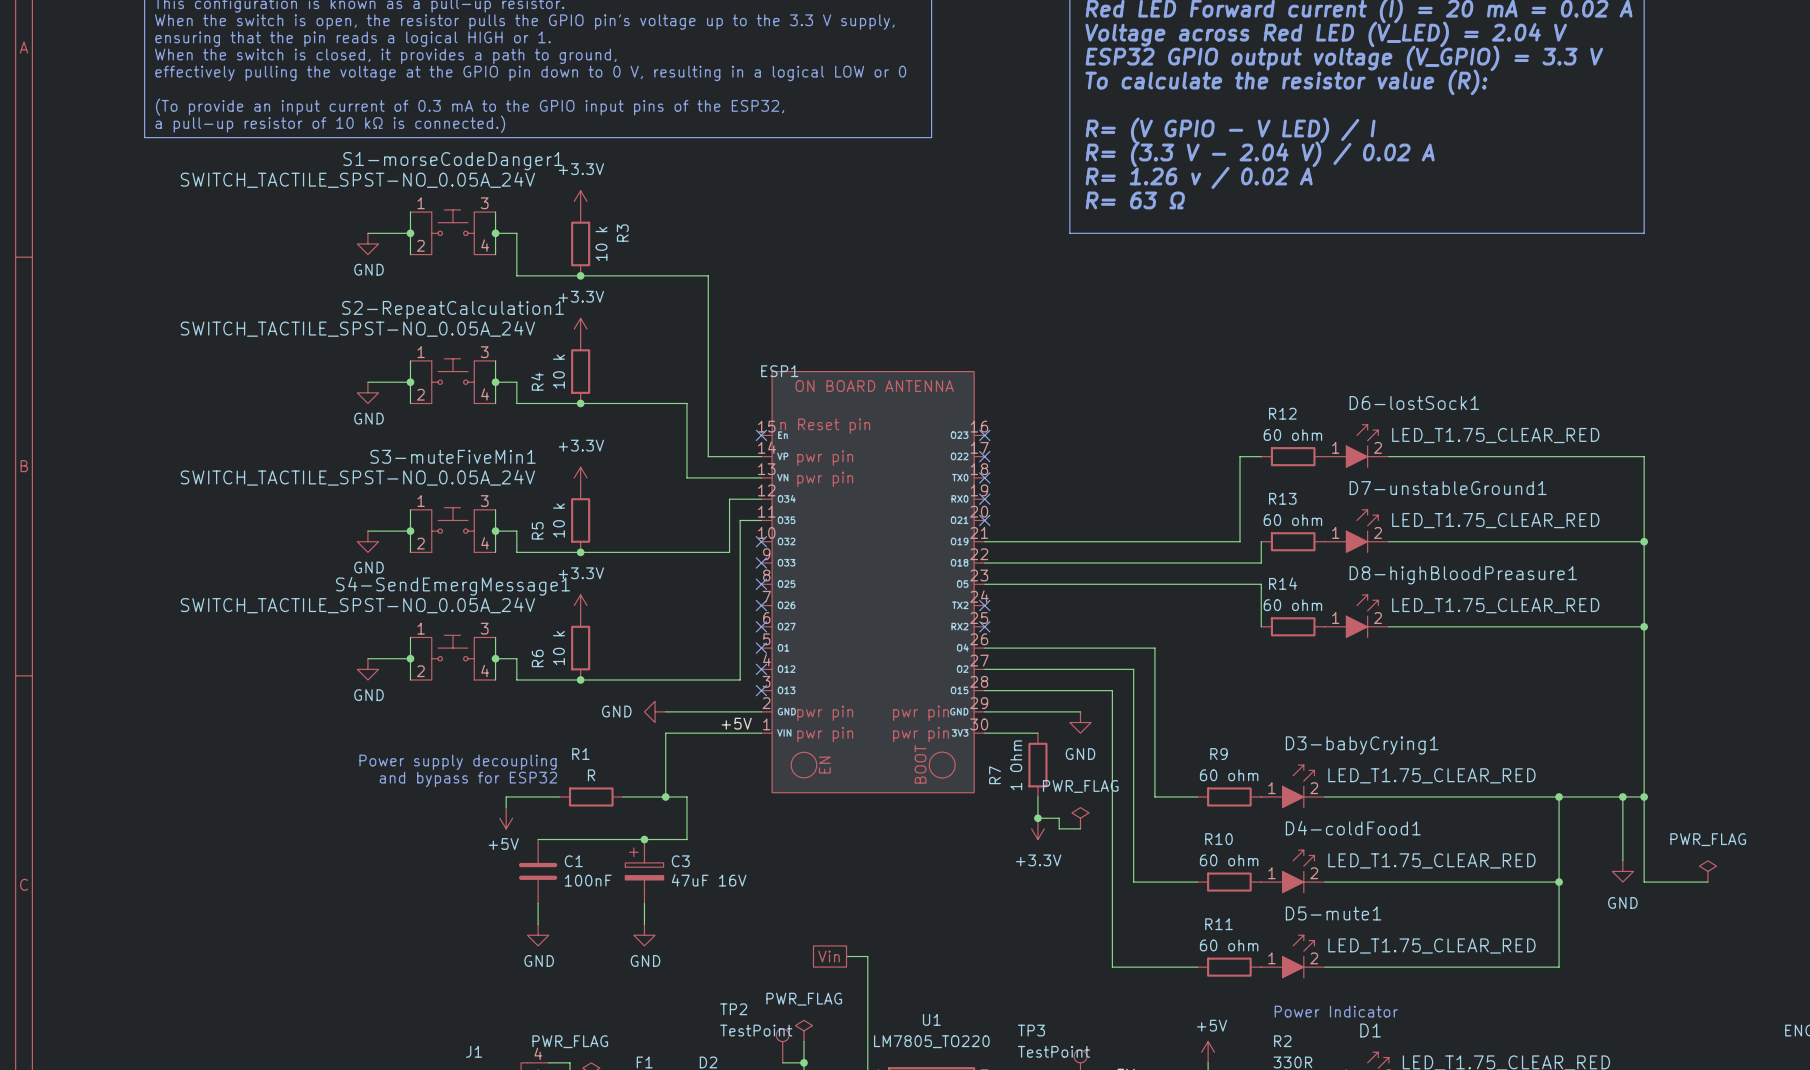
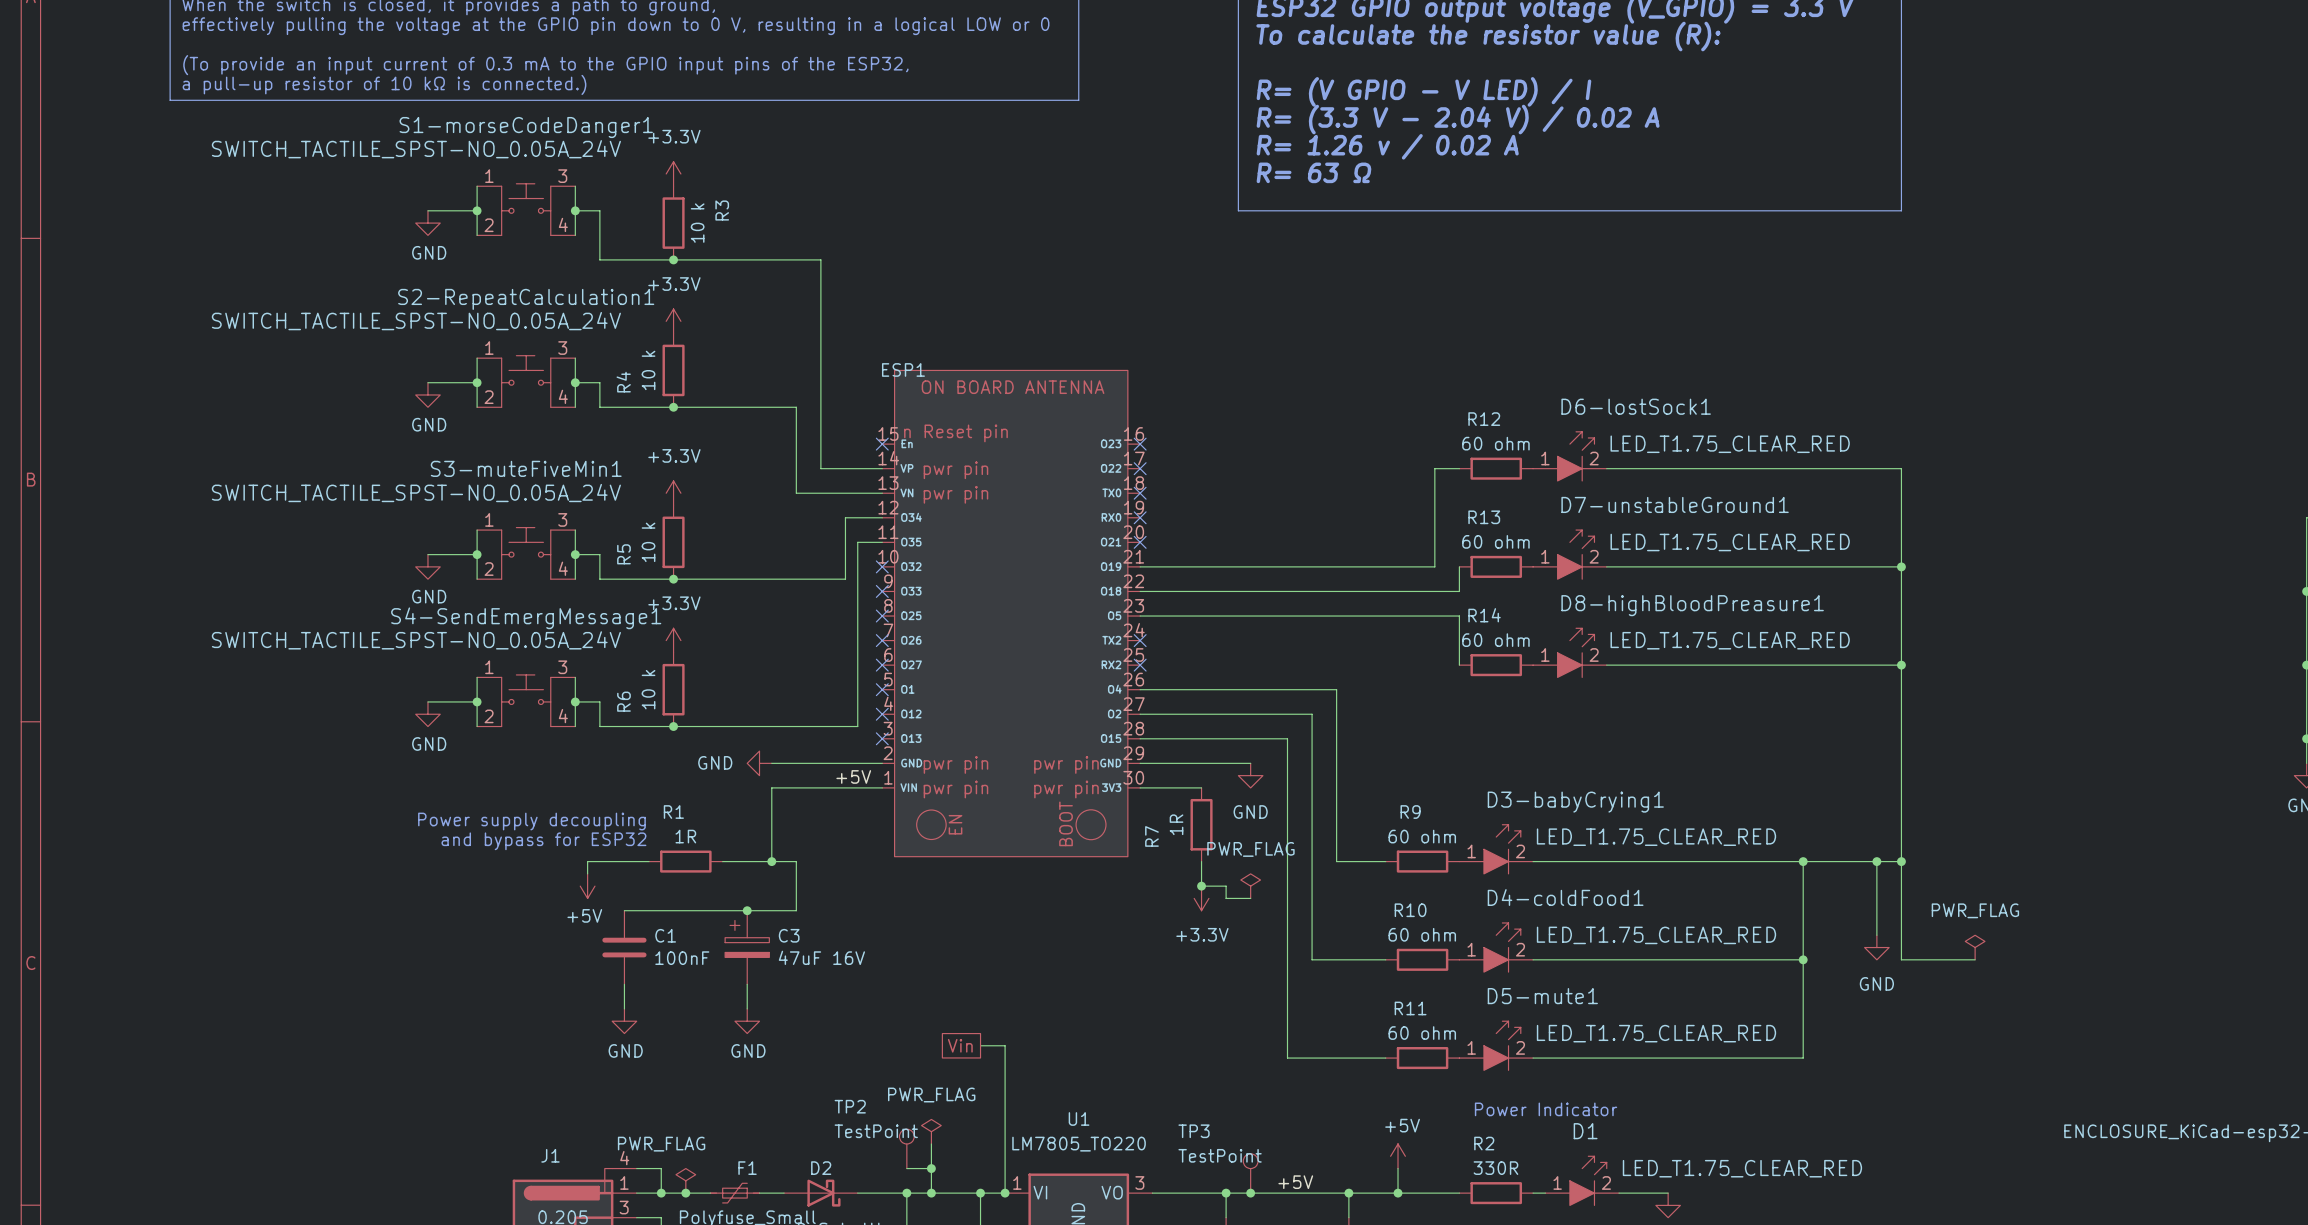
R7 value: 1 Ohm (1016, 765) -> 1R (1176, 824)
R1 value: R (591, 775) -> 1R (685, 836)

